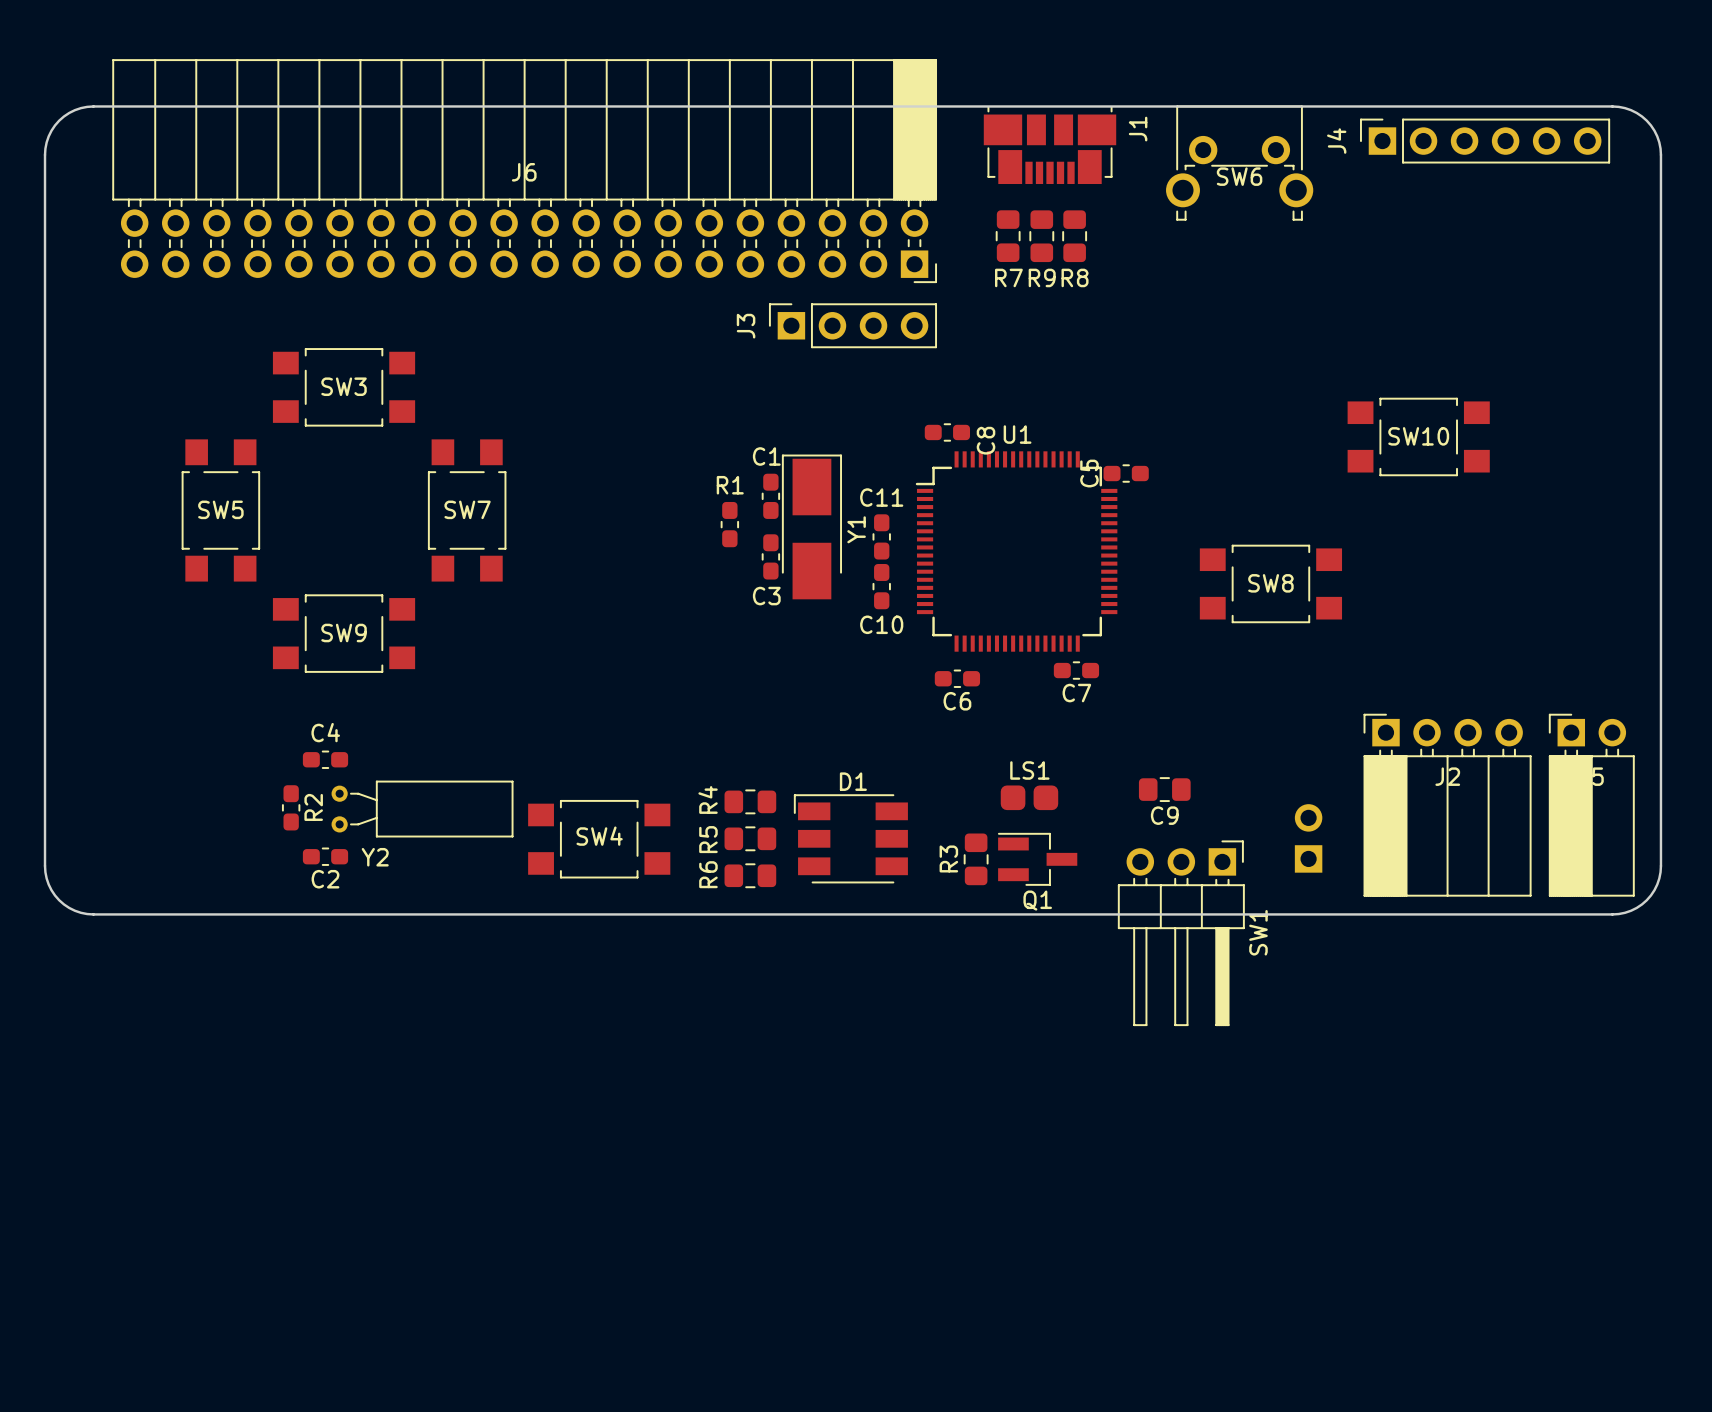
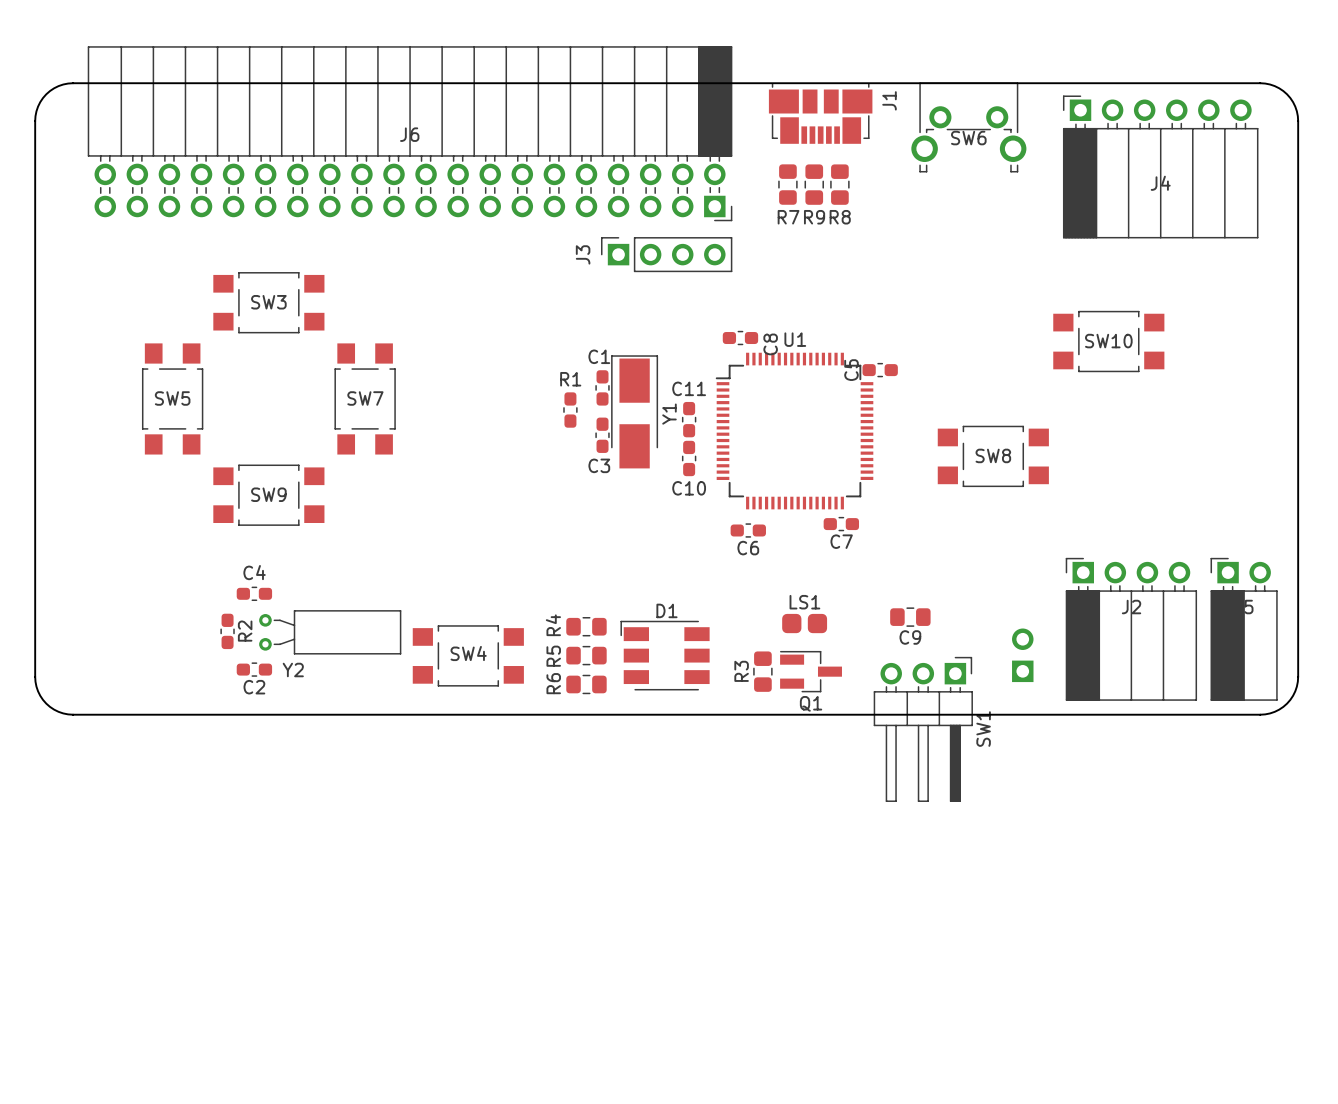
J4 footprint: [1360, 118, 1611, 164] -> [1062, 95, 1259, 239]
J4 name position: J4 (1336, 141) -> J4 (1160, 183)

